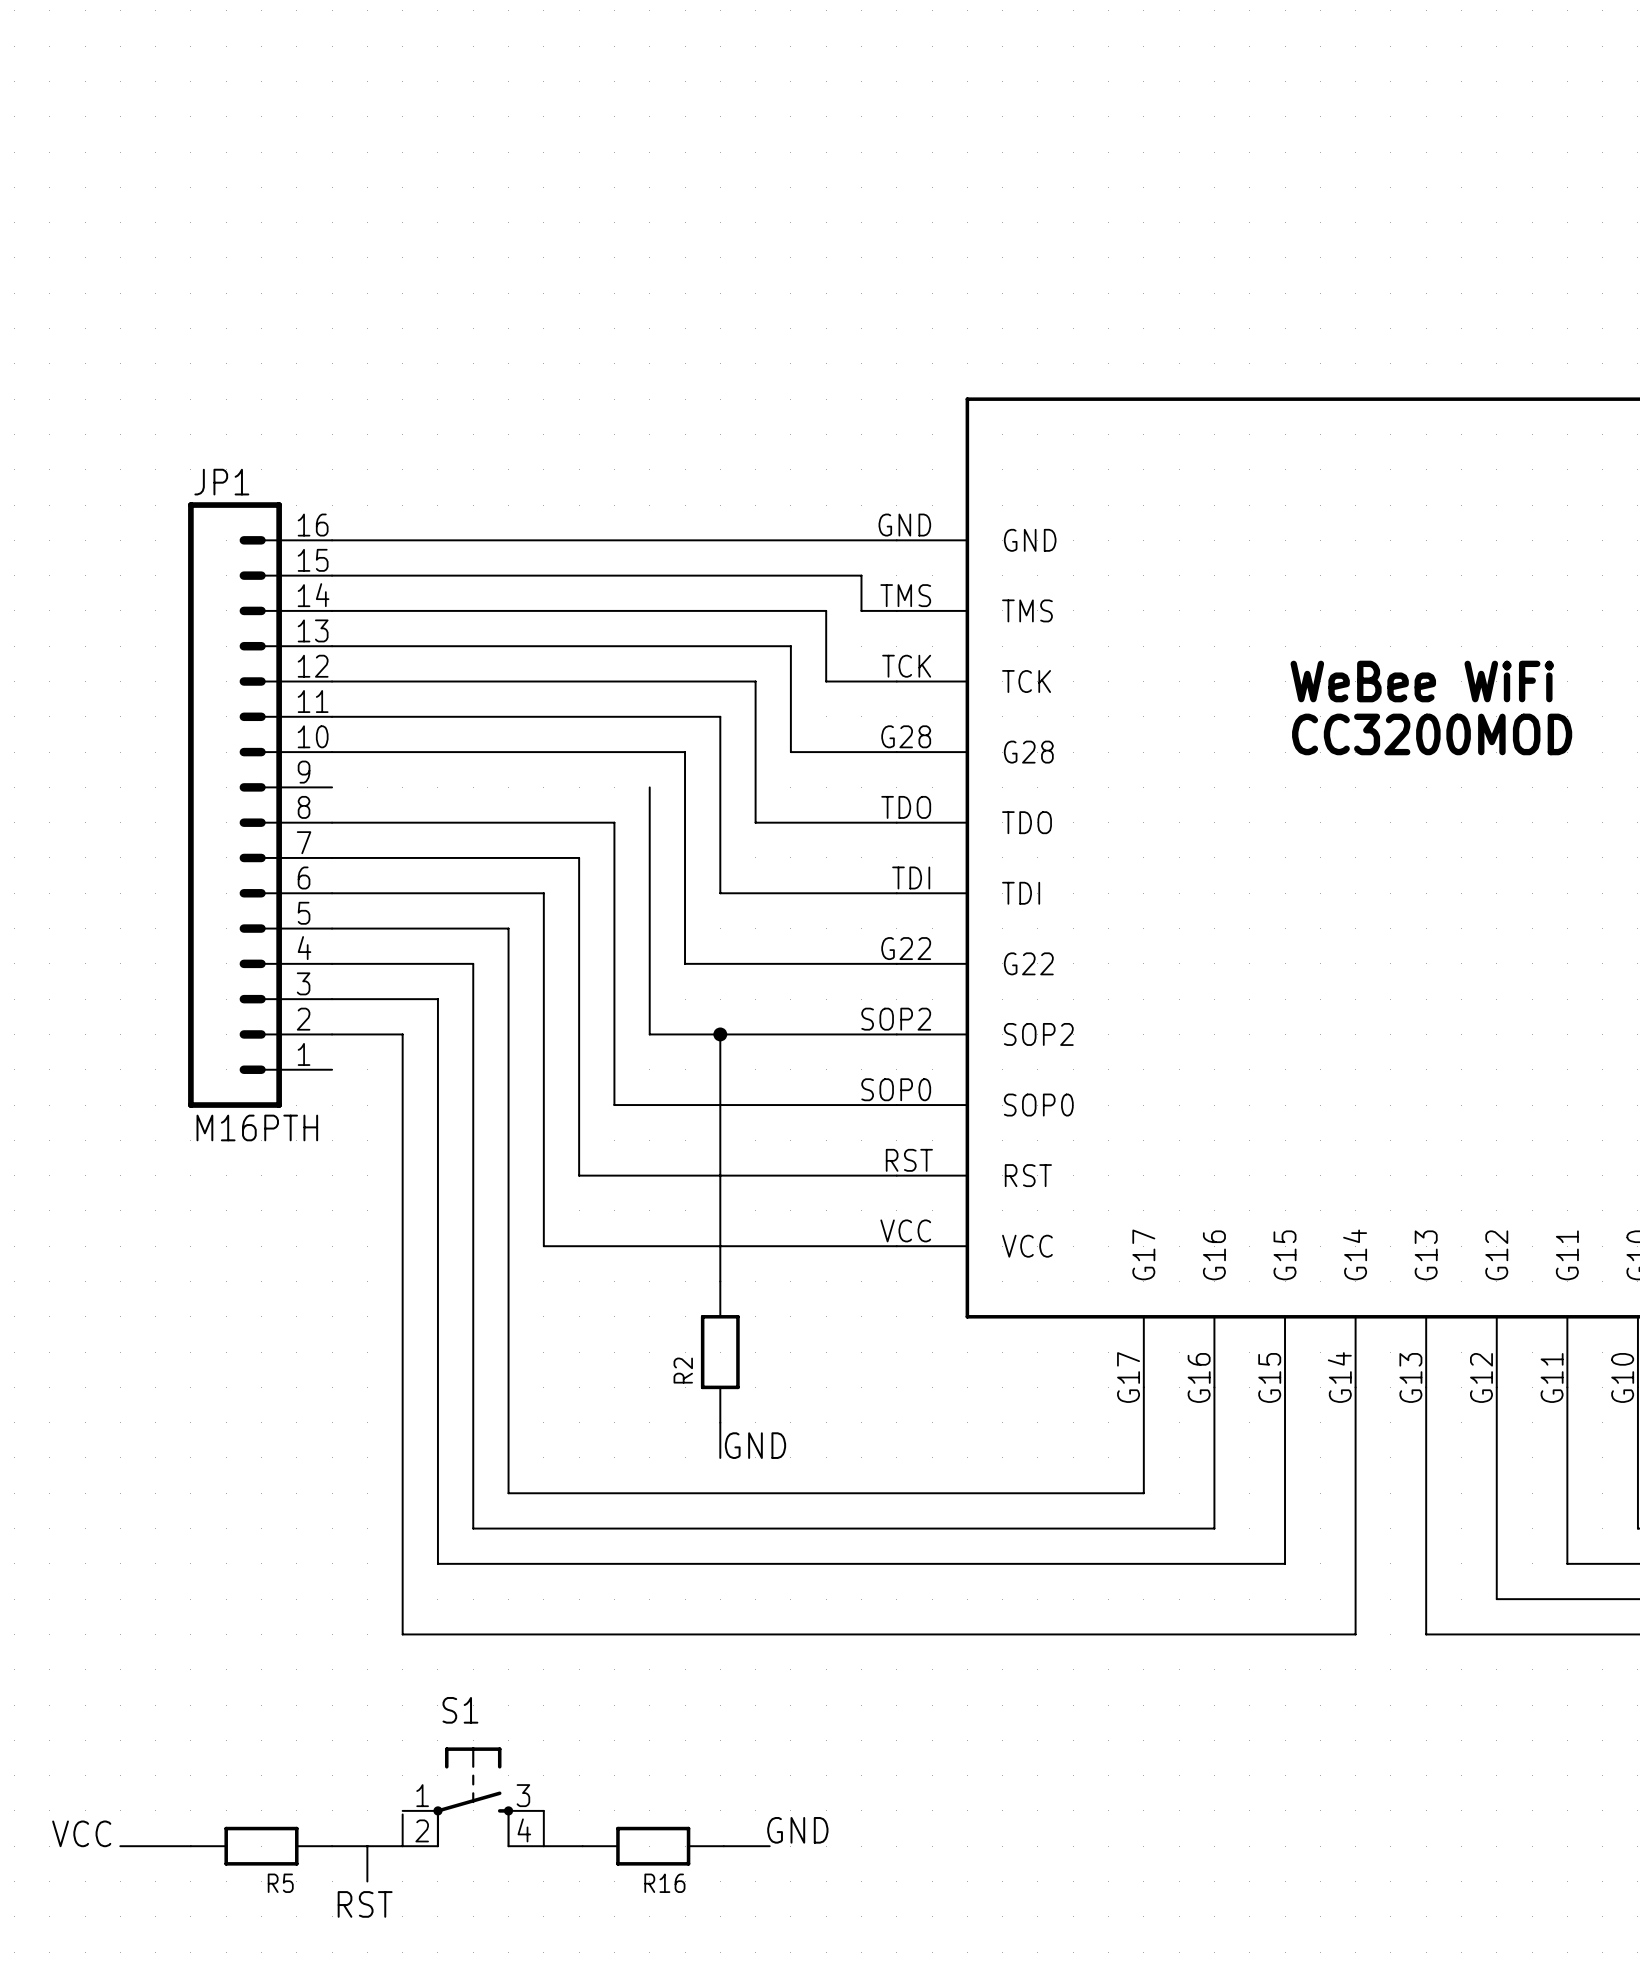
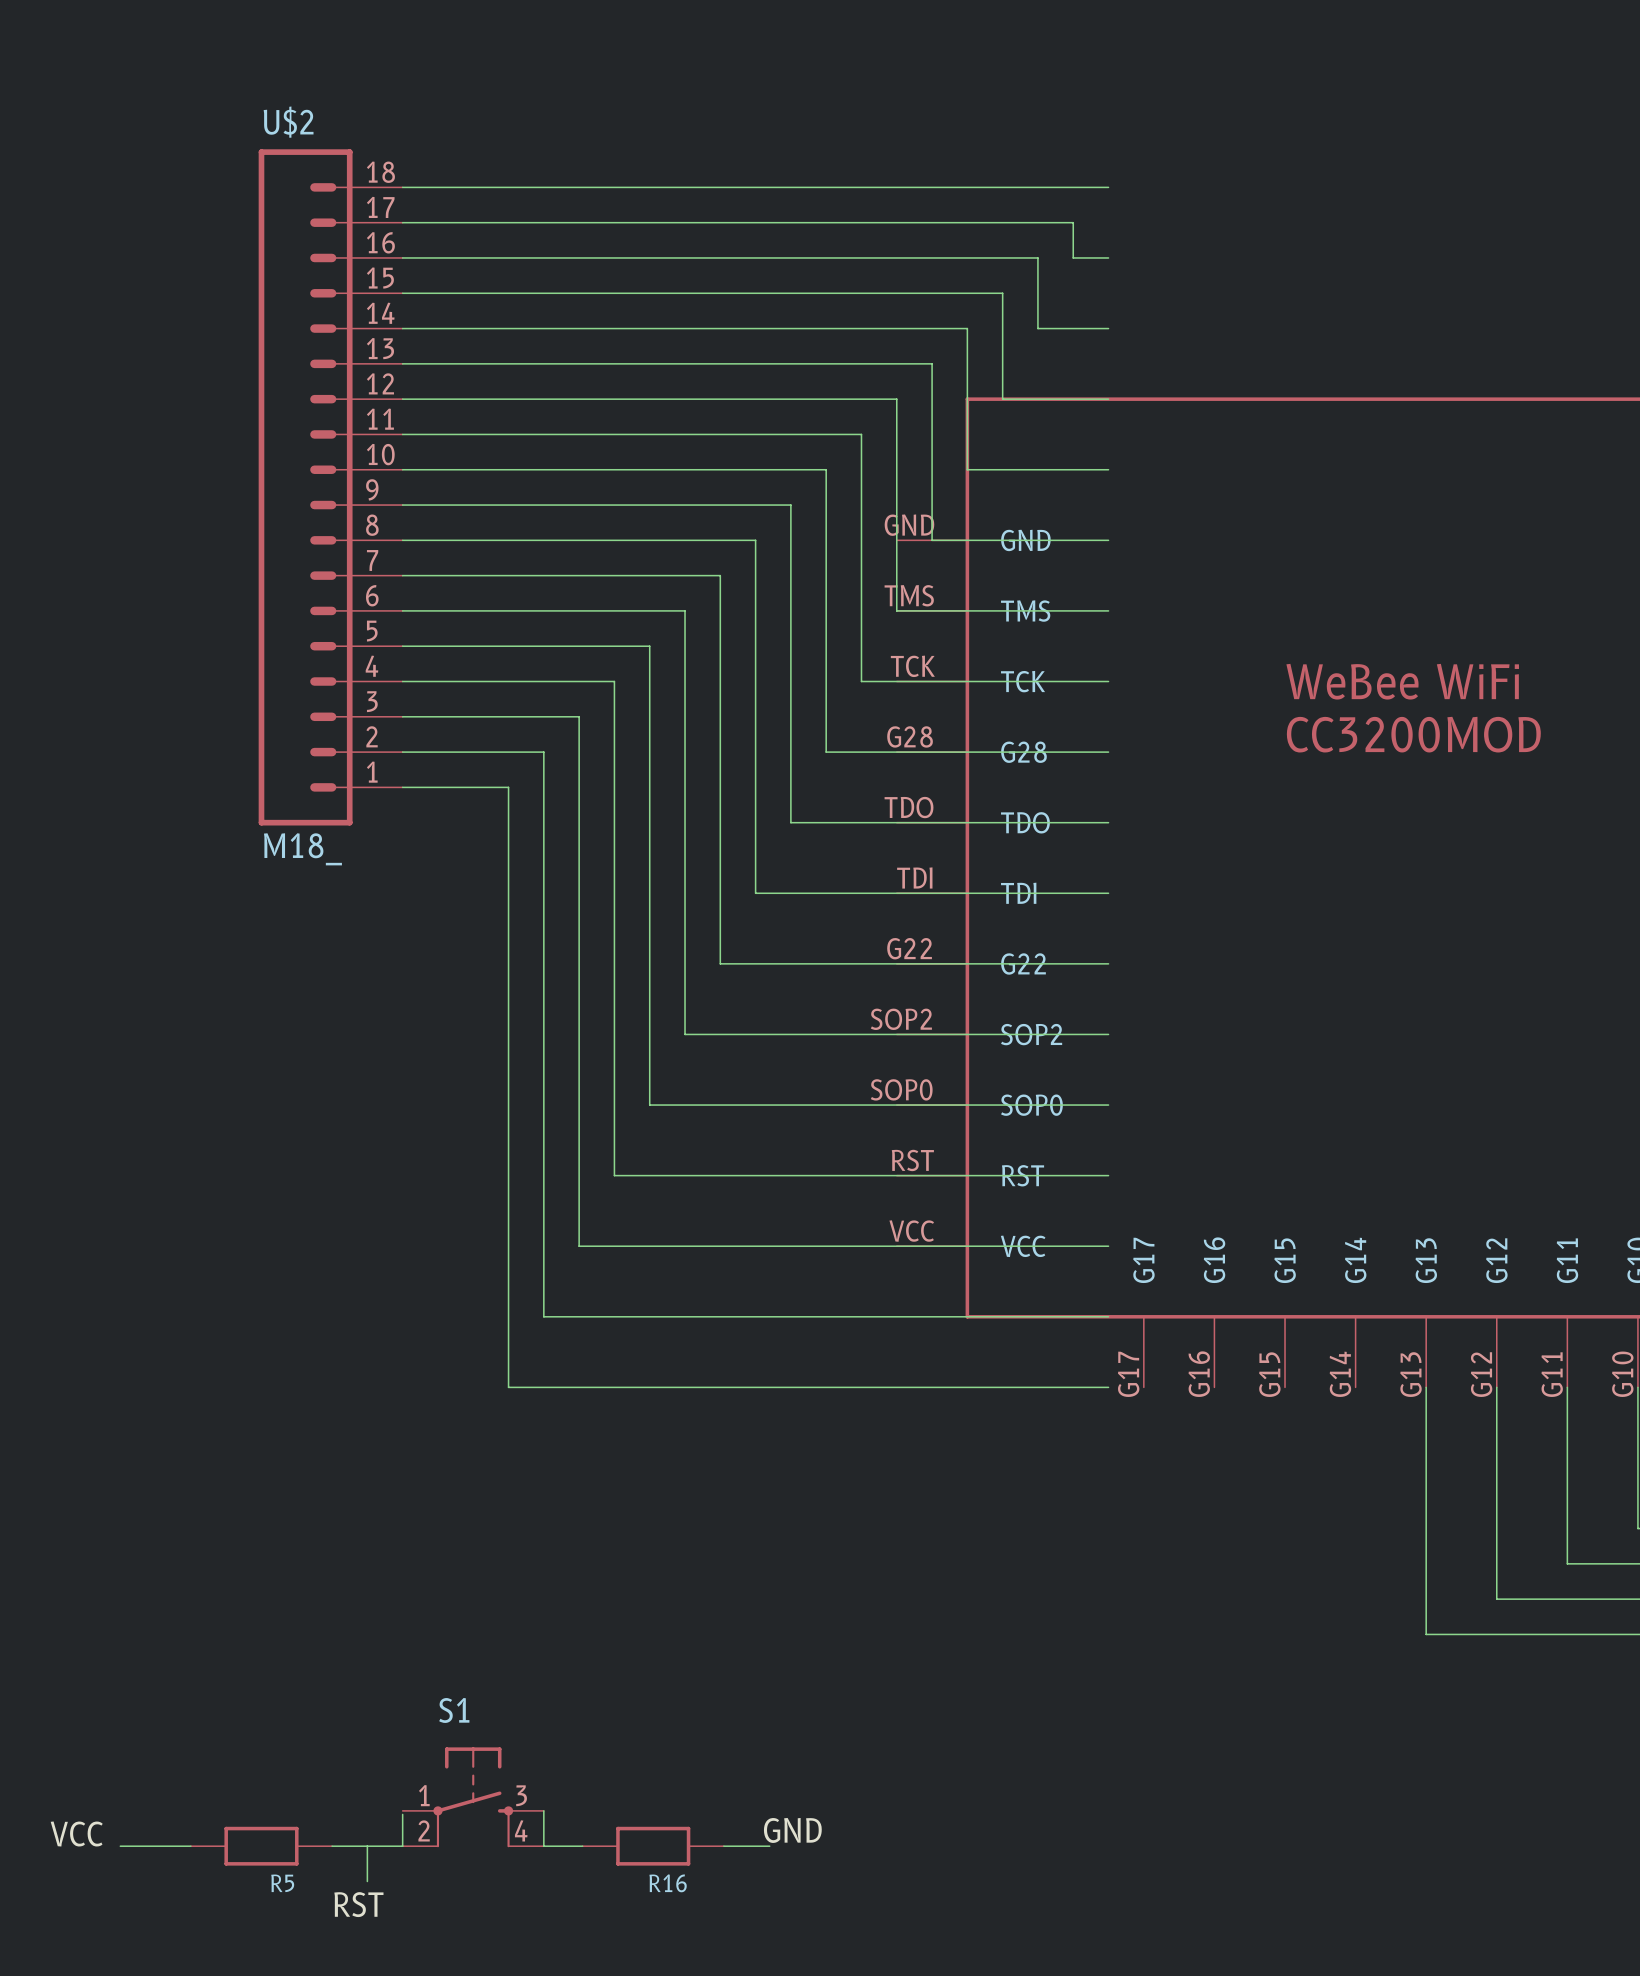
wire: none -> (402, 187) (1108, 187)
wire: none -> (402, 222) (1073, 222) (1073, 257) (1108, 257)
wire: none -> (402, 257) (1037, 257) (1037, 328) (1108, 328)
wire: none -> (402, 293) (1002, 293) (1002, 399) (1108, 399)
wire: none -> (402, 328) (967, 328) (967, 469) (1108, 469)
wire: none -> (402, 363) (932, 363) (932, 540) (1108, 540)
wire: none -> (402, 399) (896, 399) (896, 610) (1108, 610)
wire: none -> (402, 434) (861, 434) (861, 575)
wire: none -> (402, 469) (826, 469) (826, 610)
U$2: none -> M18_ (330, 487)
wire: none -> (402, 505) (790, 505) (790, 646)
wire: (755, 540) (896, 540) -> (755, 540) (755, 681)
wire: (720, 575) (861, 575) -> (720, 575) (720, 716)
wire: (685, 610) (826, 610) -> (685, 610) (685, 752)
wire: (861, 610) (896, 610) -> (861, 610) (861, 681)
wire: (649, 646) (790, 646) -> (649, 646) (649, 787)
wire: (614, 681) (755, 681) -> (614, 681) (614, 822)
wire: (826, 681) (861, 681) -> none
wire: none -> (896, 681) (1108, 681)
wire: (579, 716) (720, 716) -> (579, 716) (579, 857)
wire: (543, 752) (685, 752) -> (543, 752) (543, 893)
wire: (790, 752) (826, 752) -> (826, 681) (826, 752)
wire: none -> (790, 752) (790, 822)
wire: none -> (896, 752) (1108, 752)
JP1: M16PTH (260, 805) -> none
wire: (332, 822) (614, 822) -> none
wire: (755, 822) (790, 822) -> (755, 822) (755, 893)
wire: none -> (896, 822) (1108, 822)
wire: (332, 857) (579, 857) -> none
wire: (332, 893) (543, 893) -> none
wire: (720, 893) (755, 893) -> (720, 893) (720, 963)
wire: none -> (896, 893) (1108, 893)
wire: (332, 928) (508, 928) -> (402, 787) (508, 787) (508, 928)
wire: (332, 963) (473, 963) (473, 1528) (1214, 1528) (1214, 1387) -> none
wire: (685, 963) (720, 963) -> (685, 963) (685, 1034)
wire: none -> (896, 963) (1108, 963)
wire: (332, 999) (437, 999) (437, 1563) (1285, 1563) (1285, 1387) -> none
wire: (332, 1034) (402, 1034) (402, 1634) (1355, 1634) (1355, 1387) -> none
wire: (649, 1034) (685, 1034) -> (649, 1034) (649, 1105)
wire: (720, 1034) (720, 1281) -> none
junction: (720, 1034) -> none
wire: none -> (896, 1034) (1108, 1034)
wire: (614, 1105) (649, 1105) -> (614, 1105) (614, 1175)
wire: none -> (896, 1105) (1108, 1105)
wire: (579, 1175) (614, 1175) -> (579, 1175) (579, 1246)
wire: none -> (896, 1175) (1108, 1175)
wire: (543, 1246) (579, 1246) -> (543, 1246) (543, 1316) (1108, 1316)
wire: none -> (896, 1246) (1108, 1246)
R2: (720, 1352) -> none
wire: (508, 1387) (508, 1493) (1143, 1493) (1143, 1387) -> (508, 1387) (1108, 1387)
wire: (720, 1422) (720, 1457) -> none
label: GND (755, 1445) -> none

